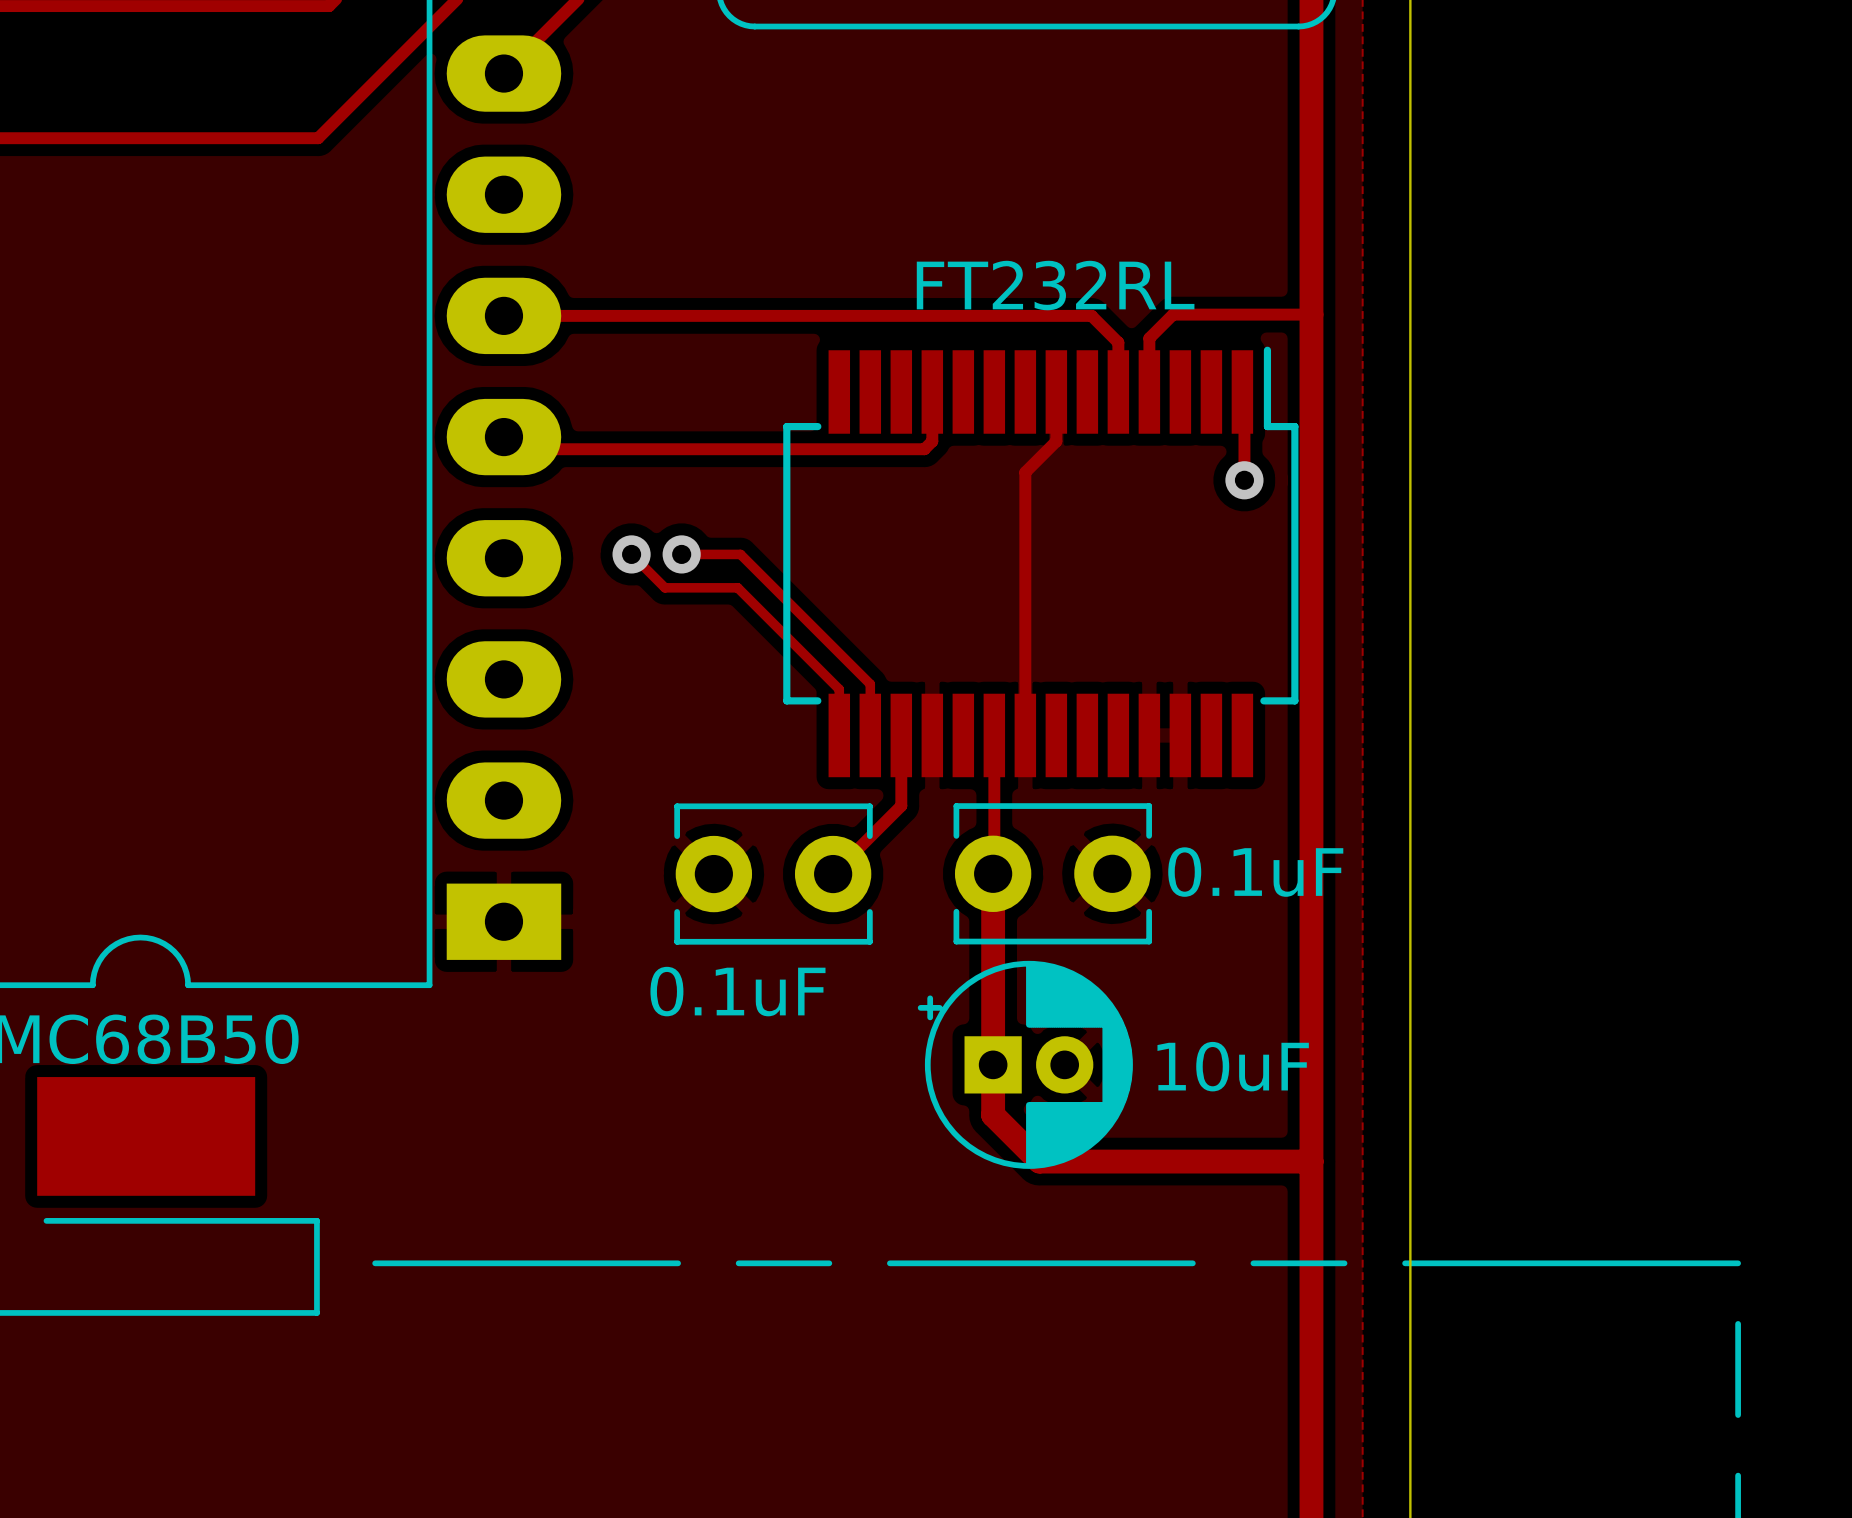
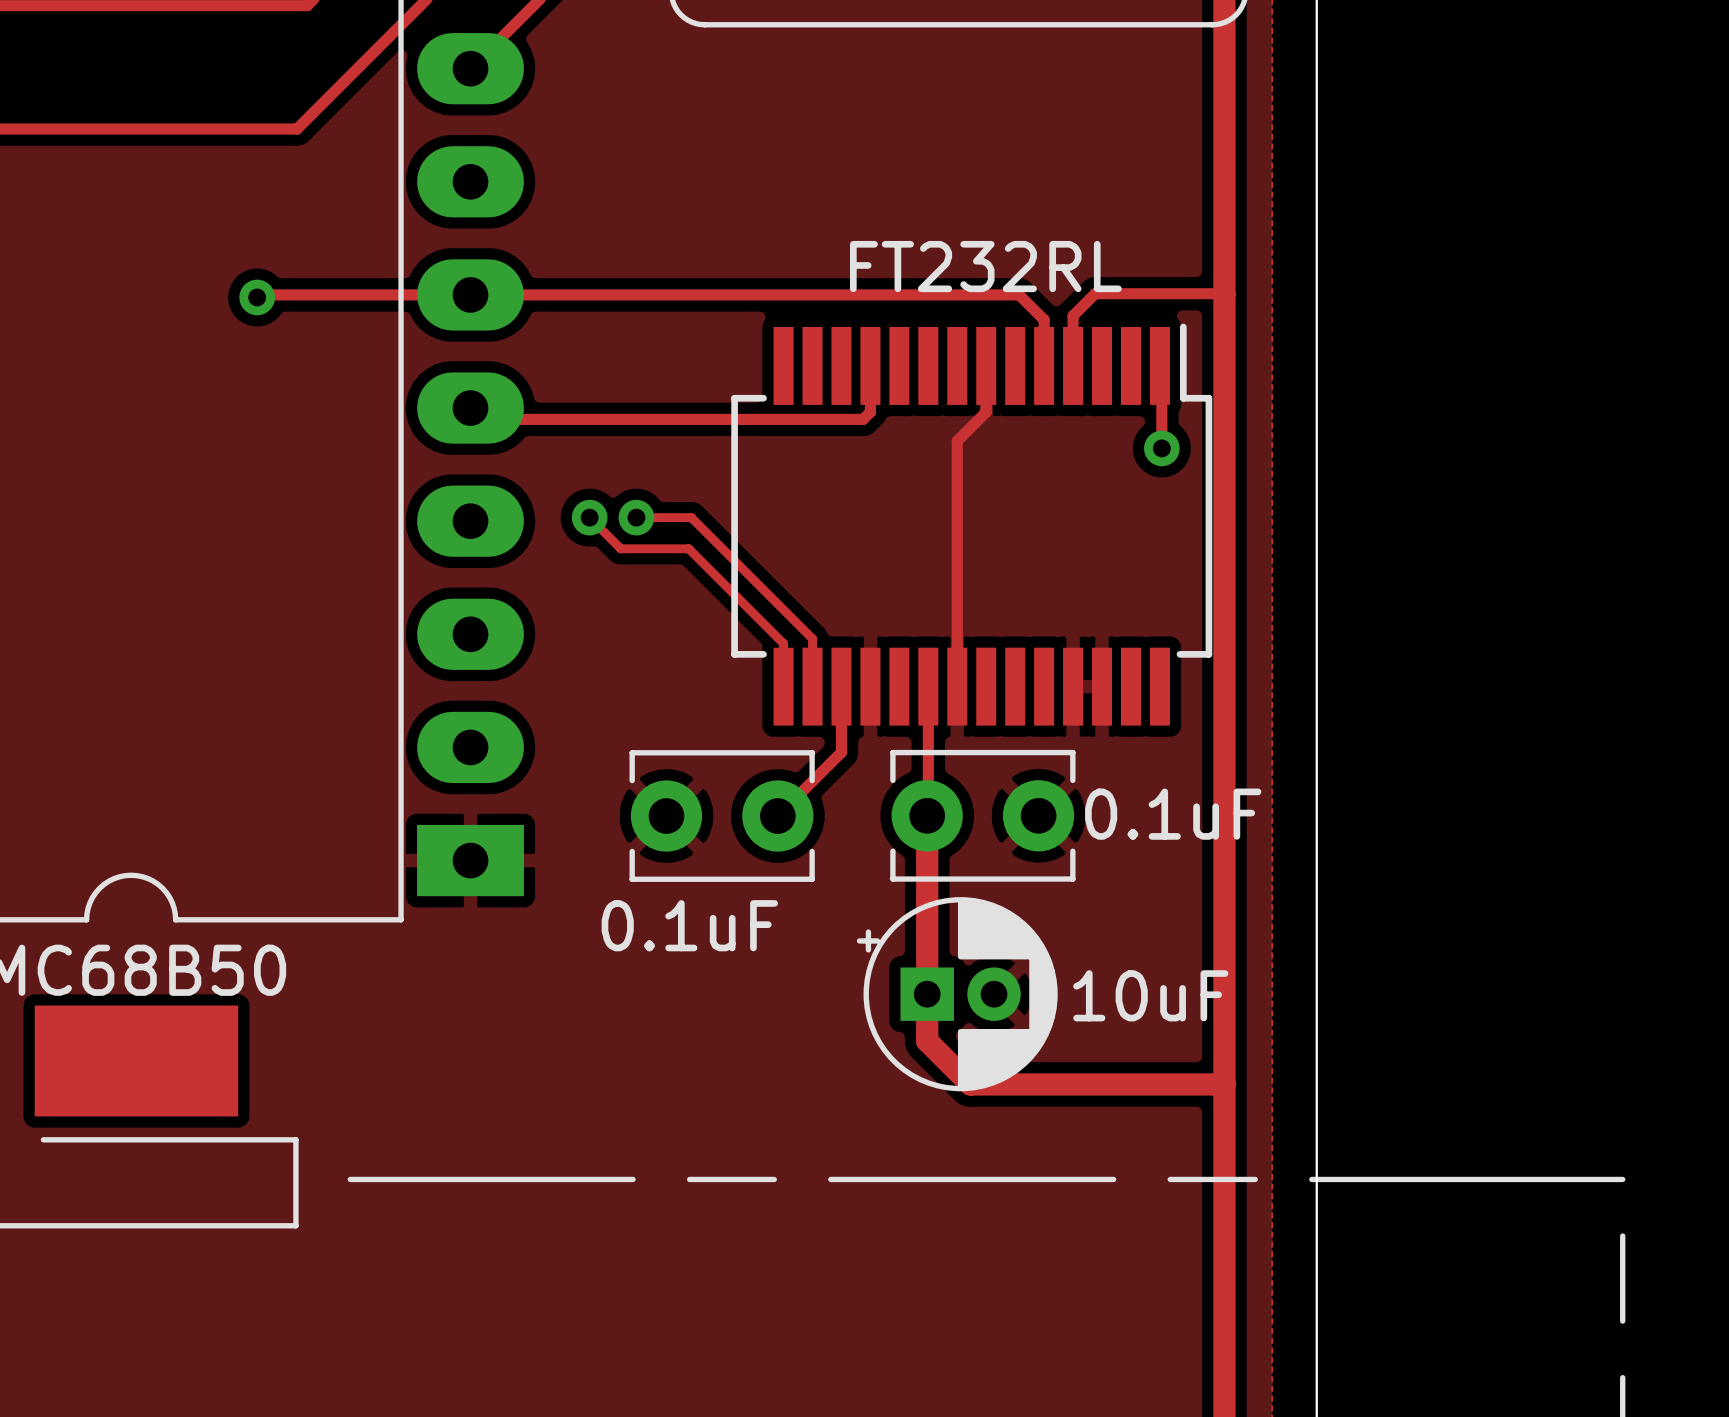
track: none -> (470, 294) (259, 294) (257, 297)
via: none -> (257, 297)

